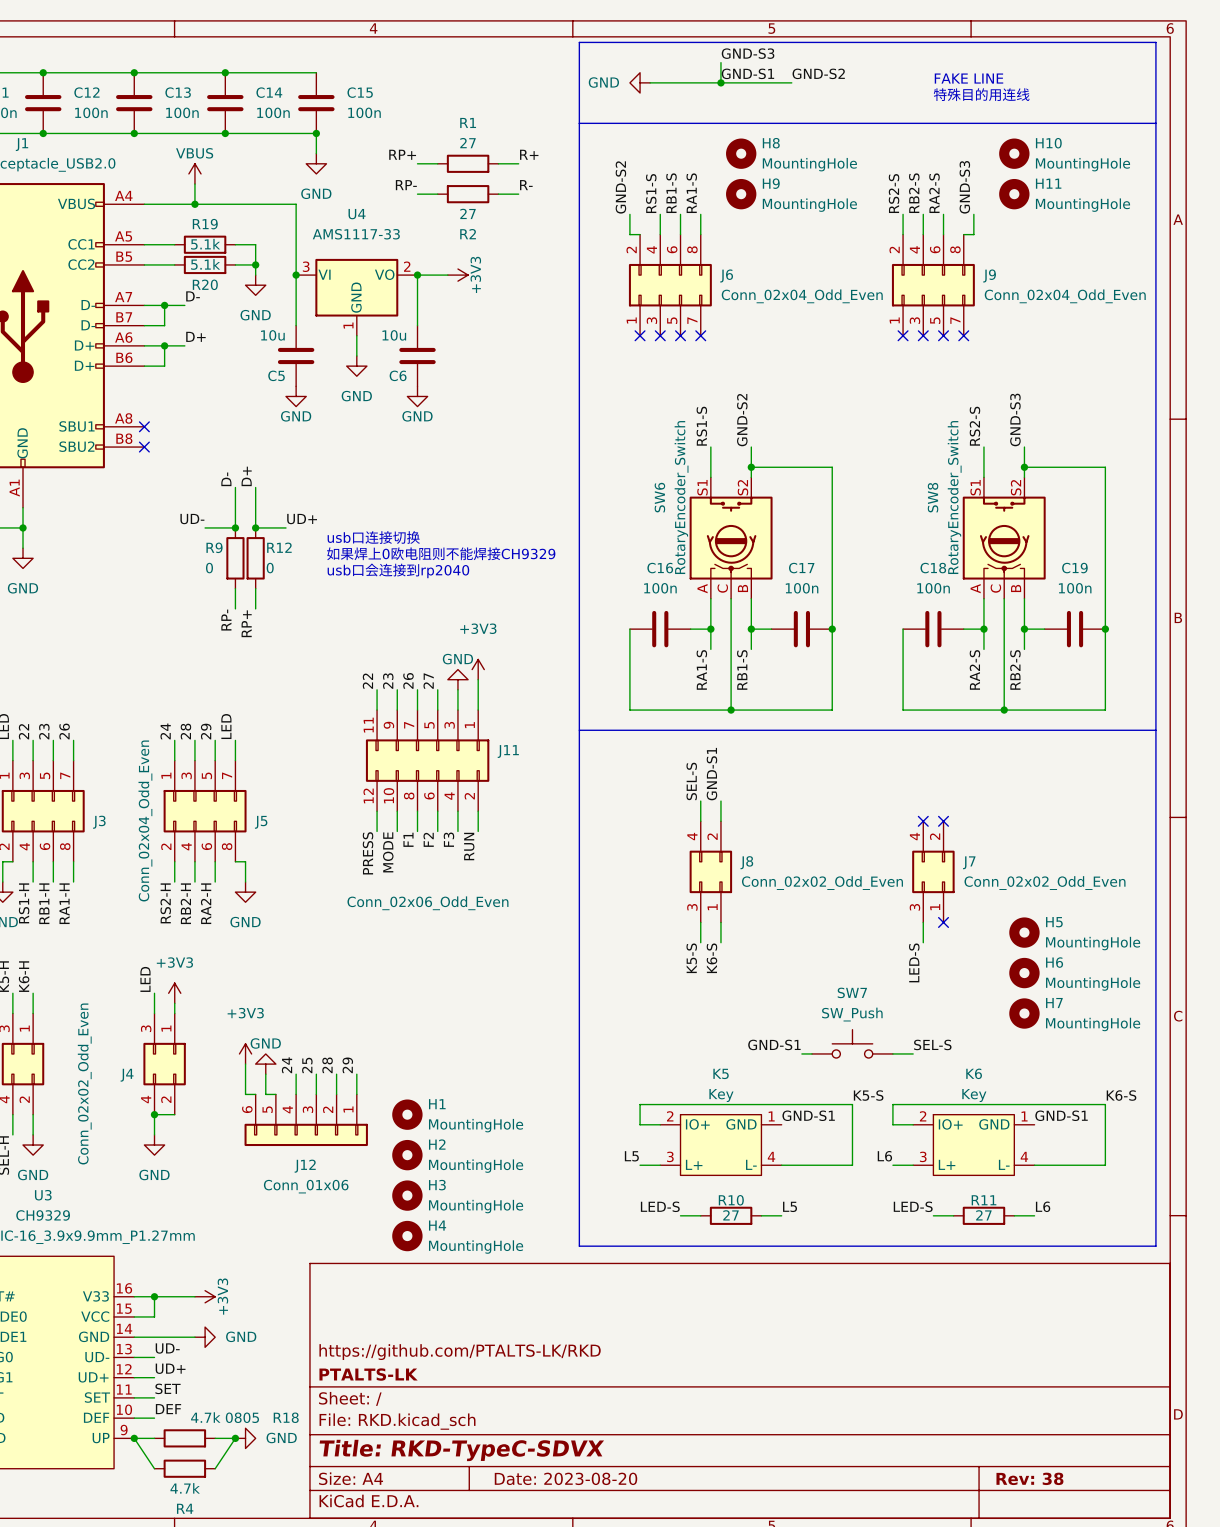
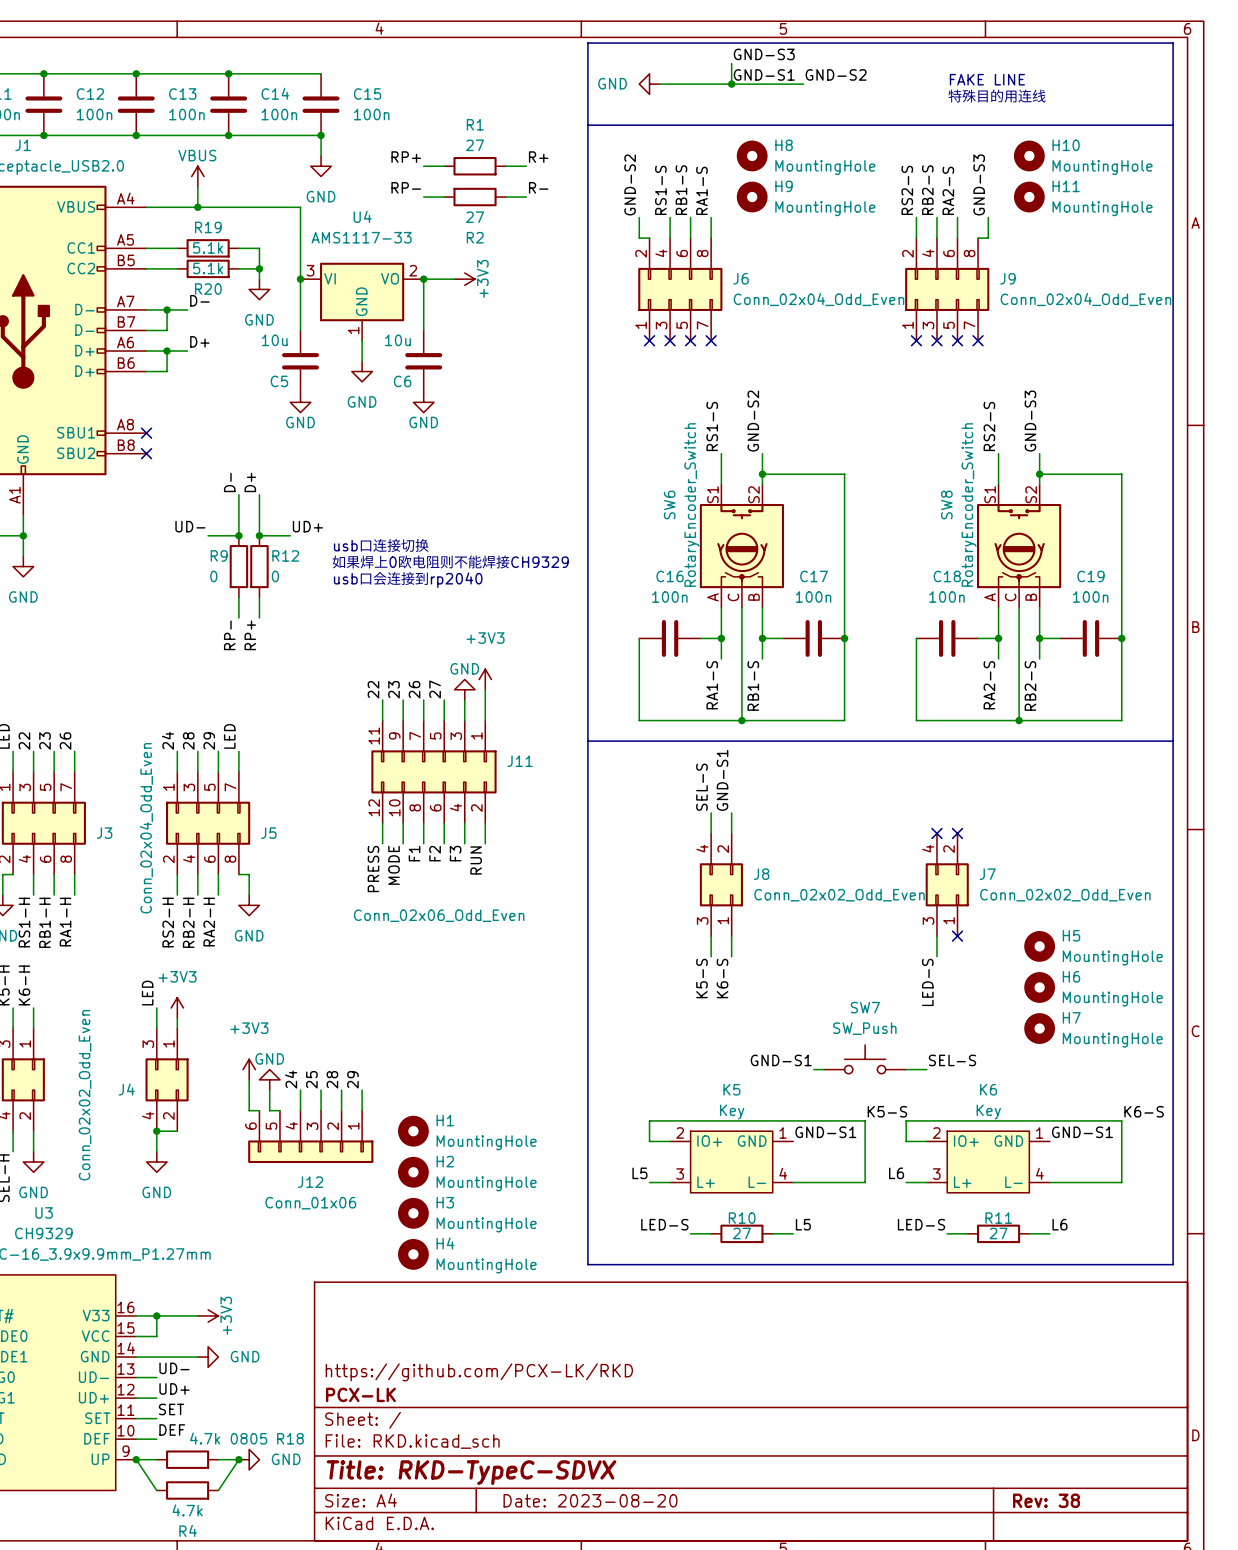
title block: https://github.com/PTALTS-LK/RKD (460, 1352) -> https://github.com/PCX-LK/RKD (479, 1372)
title block: PTALTS-LK (368, 1374) -> PCX-LK (360, 1394)

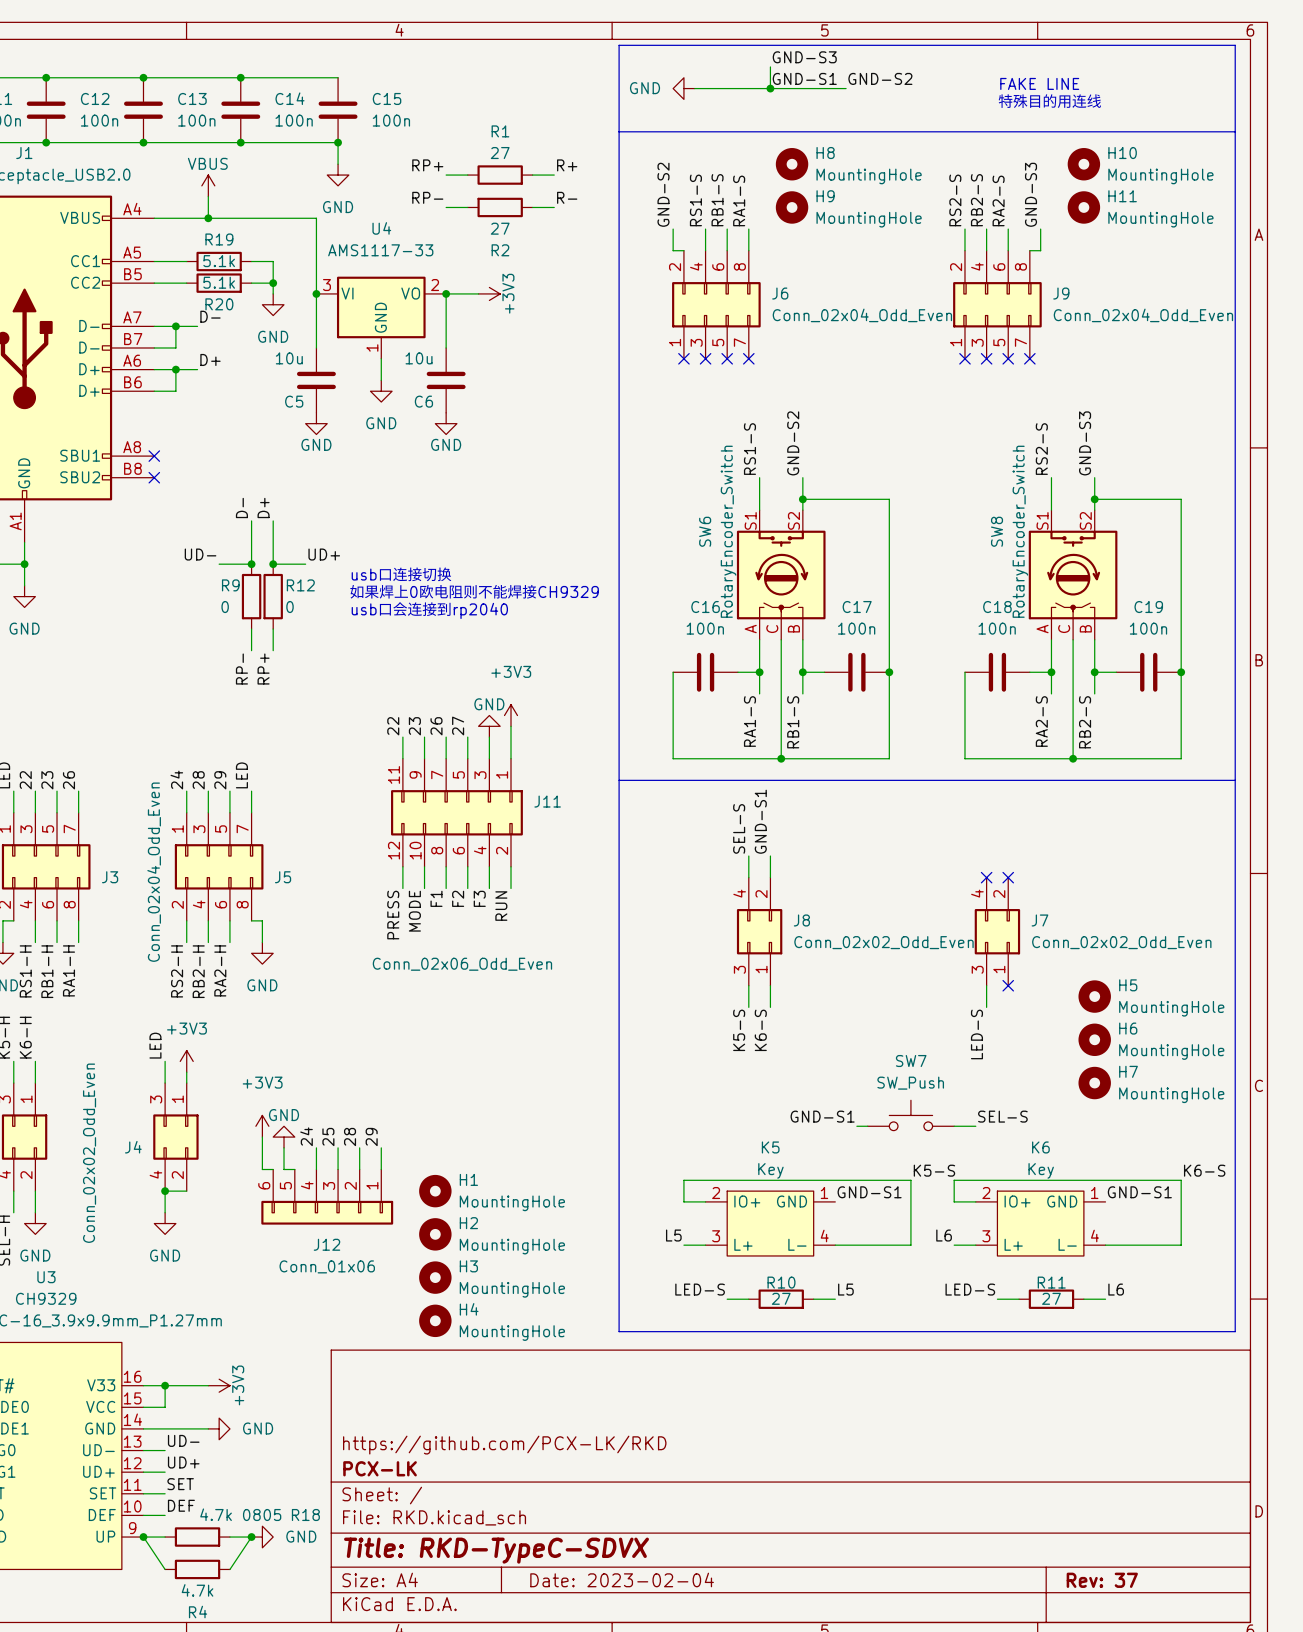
SW6 symbol: [699, 484, 785, 608] -> [736, 510, 826, 640]
SW8 symbol: [977, 484, 1062, 608] -> [1028, 510, 1118, 640]
title block: Date: 2023-08-20 (590, 1500) -> Date: 2023-02-04 (622, 1579)
title block: Rev: 38 (1046, 1500) -> Rev: 37 (1102, 1580)

